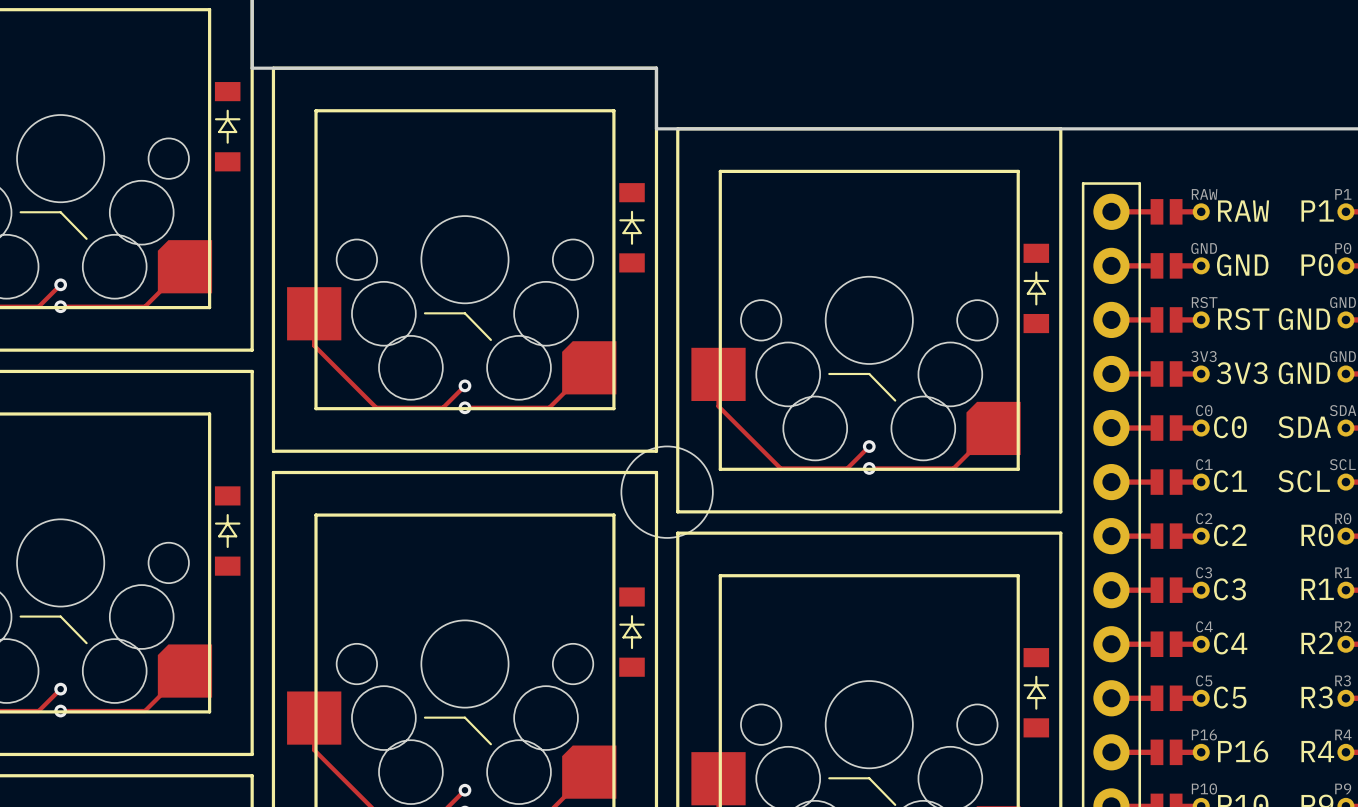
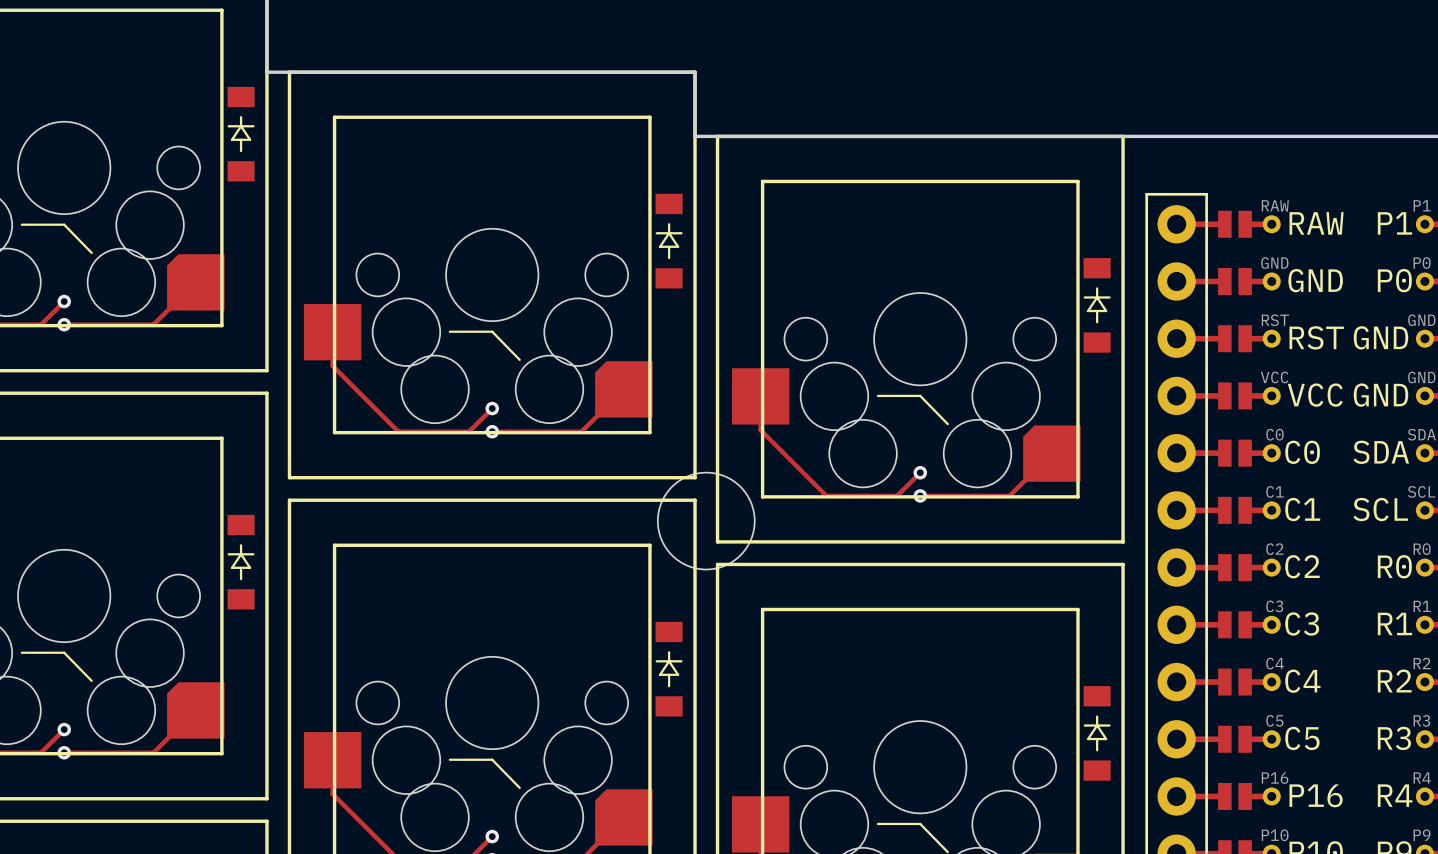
part text: 3V3 (1203, 356) -> VCC (1274, 377)
part text: 3V3 (1242, 373) -> VCC (1315, 395)

